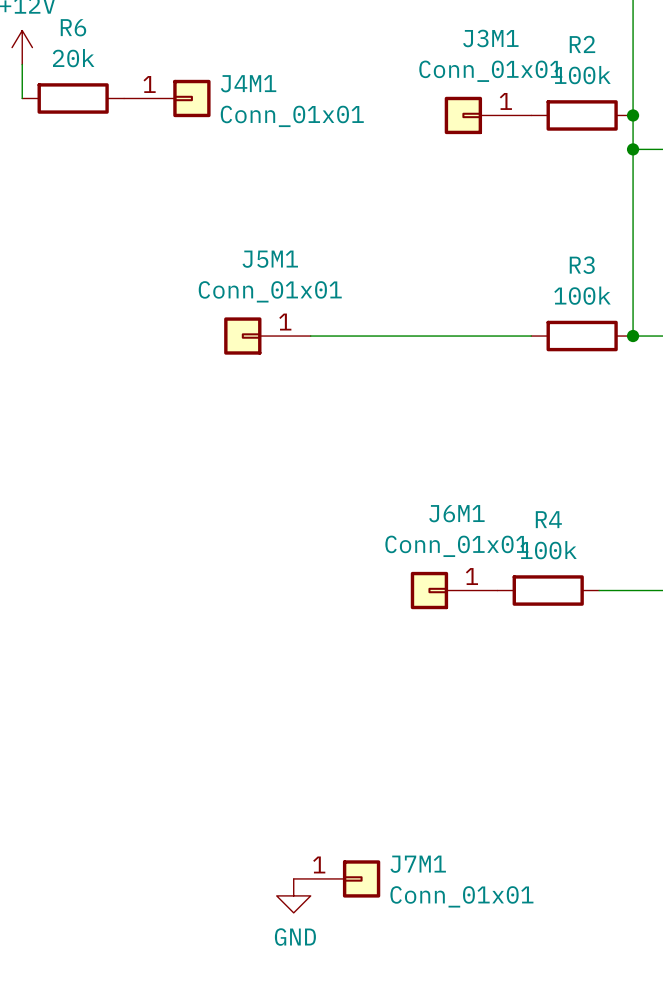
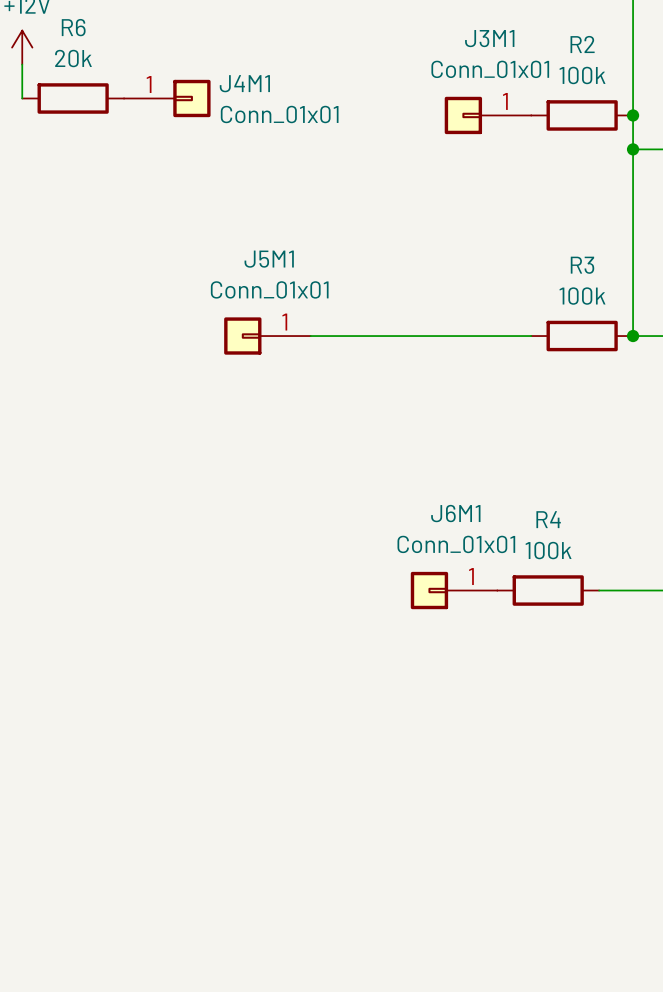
J7M1: Conn_01x01 (336, 878) -> none
power symbol: GND (293, 895) -> none

